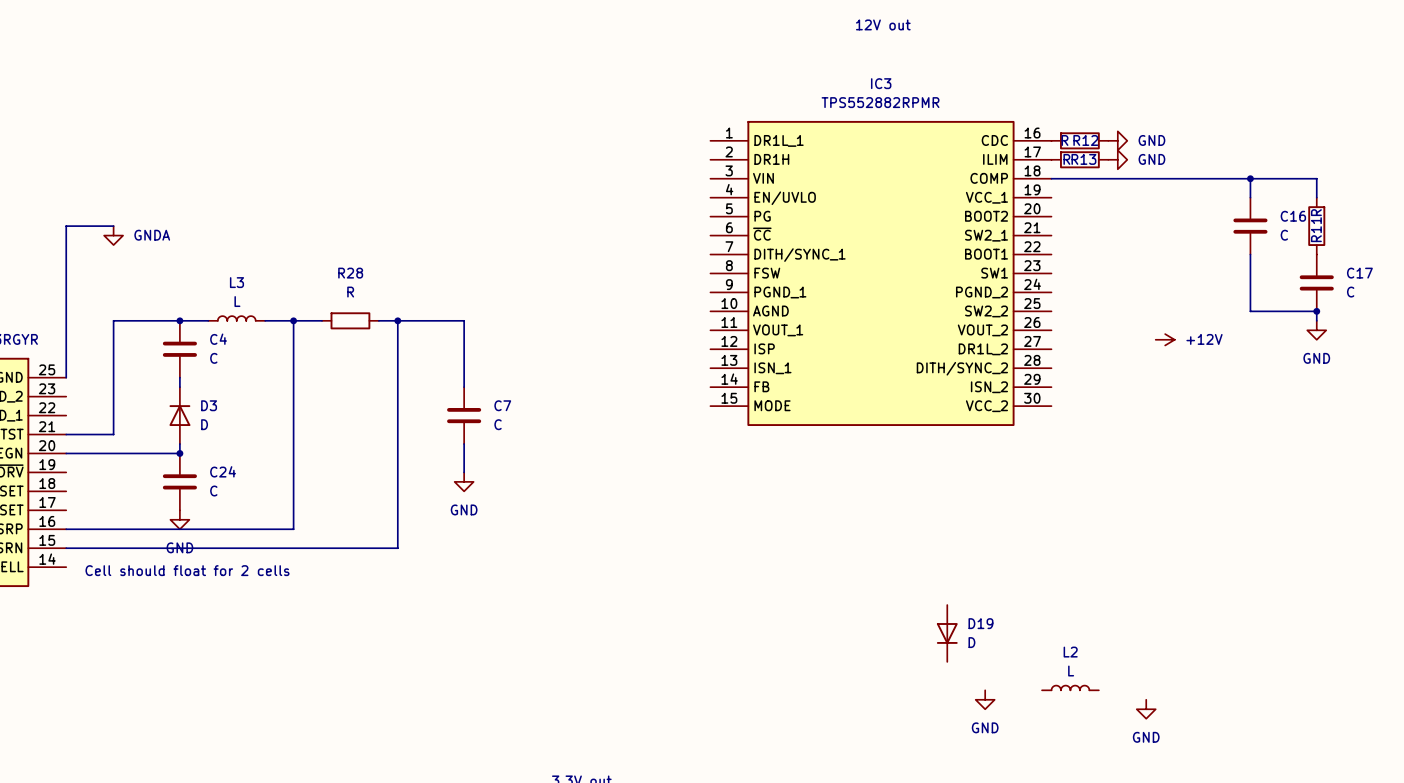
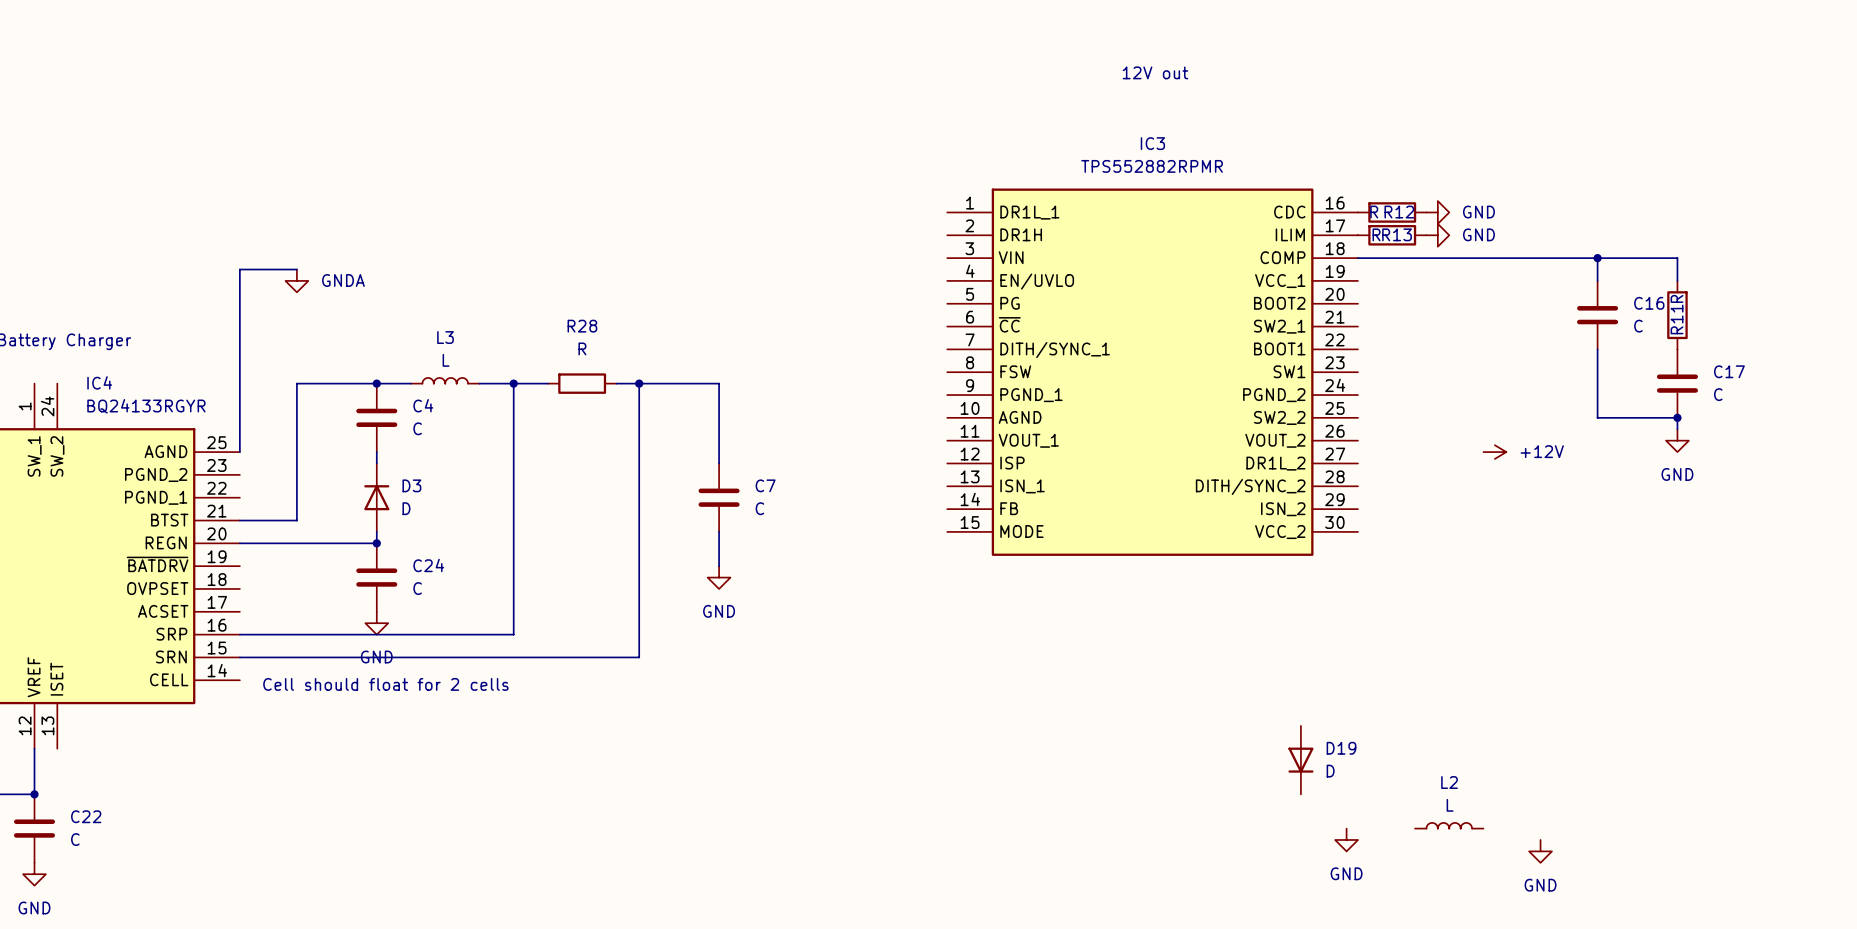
text position: 12V out (883, 24) -> 12V out (1155, 72)
R12 position: (1079, 140) -> (1392, 212)
power symbol: GND (1117, 140) -> none
R13 position: (1079, 159) -> (1392, 235)
power symbol: GND (1117, 159) -> none
wire: (1051, 178) (1316, 178) (1316, 197) -> (1357, 258) (1677, 258) (1677, 280)
power symbol: none -> GND (1437, 212)
wire: (1250, 178) (1250, 197) -> (1597, 258) (1597, 280)
junction: (1250, 178) -> none
power symbol: none -> GND (1437, 235)
junction: none -> (1597, 258)
C16 position: (1250, 226) -> (1597, 315)
R11 position: (1316, 226) -> (1677, 315)
wire: (1250, 254) (1250, 311) (1316, 311) (1316, 320) -> (1597, 349) (1597, 417) (1677, 417) (1677, 429)
IC3 position: (880, 273) -> (1152, 372)
C17 position: (1316, 282) -> (1677, 383)
junction: (1316, 311) -> none
power symbol position: GND (1316, 330) -> GND (1677, 440)
power symbol position: +12V (1165, 339) -> +12V (1494, 452)
junction: none -> (1677, 417)

